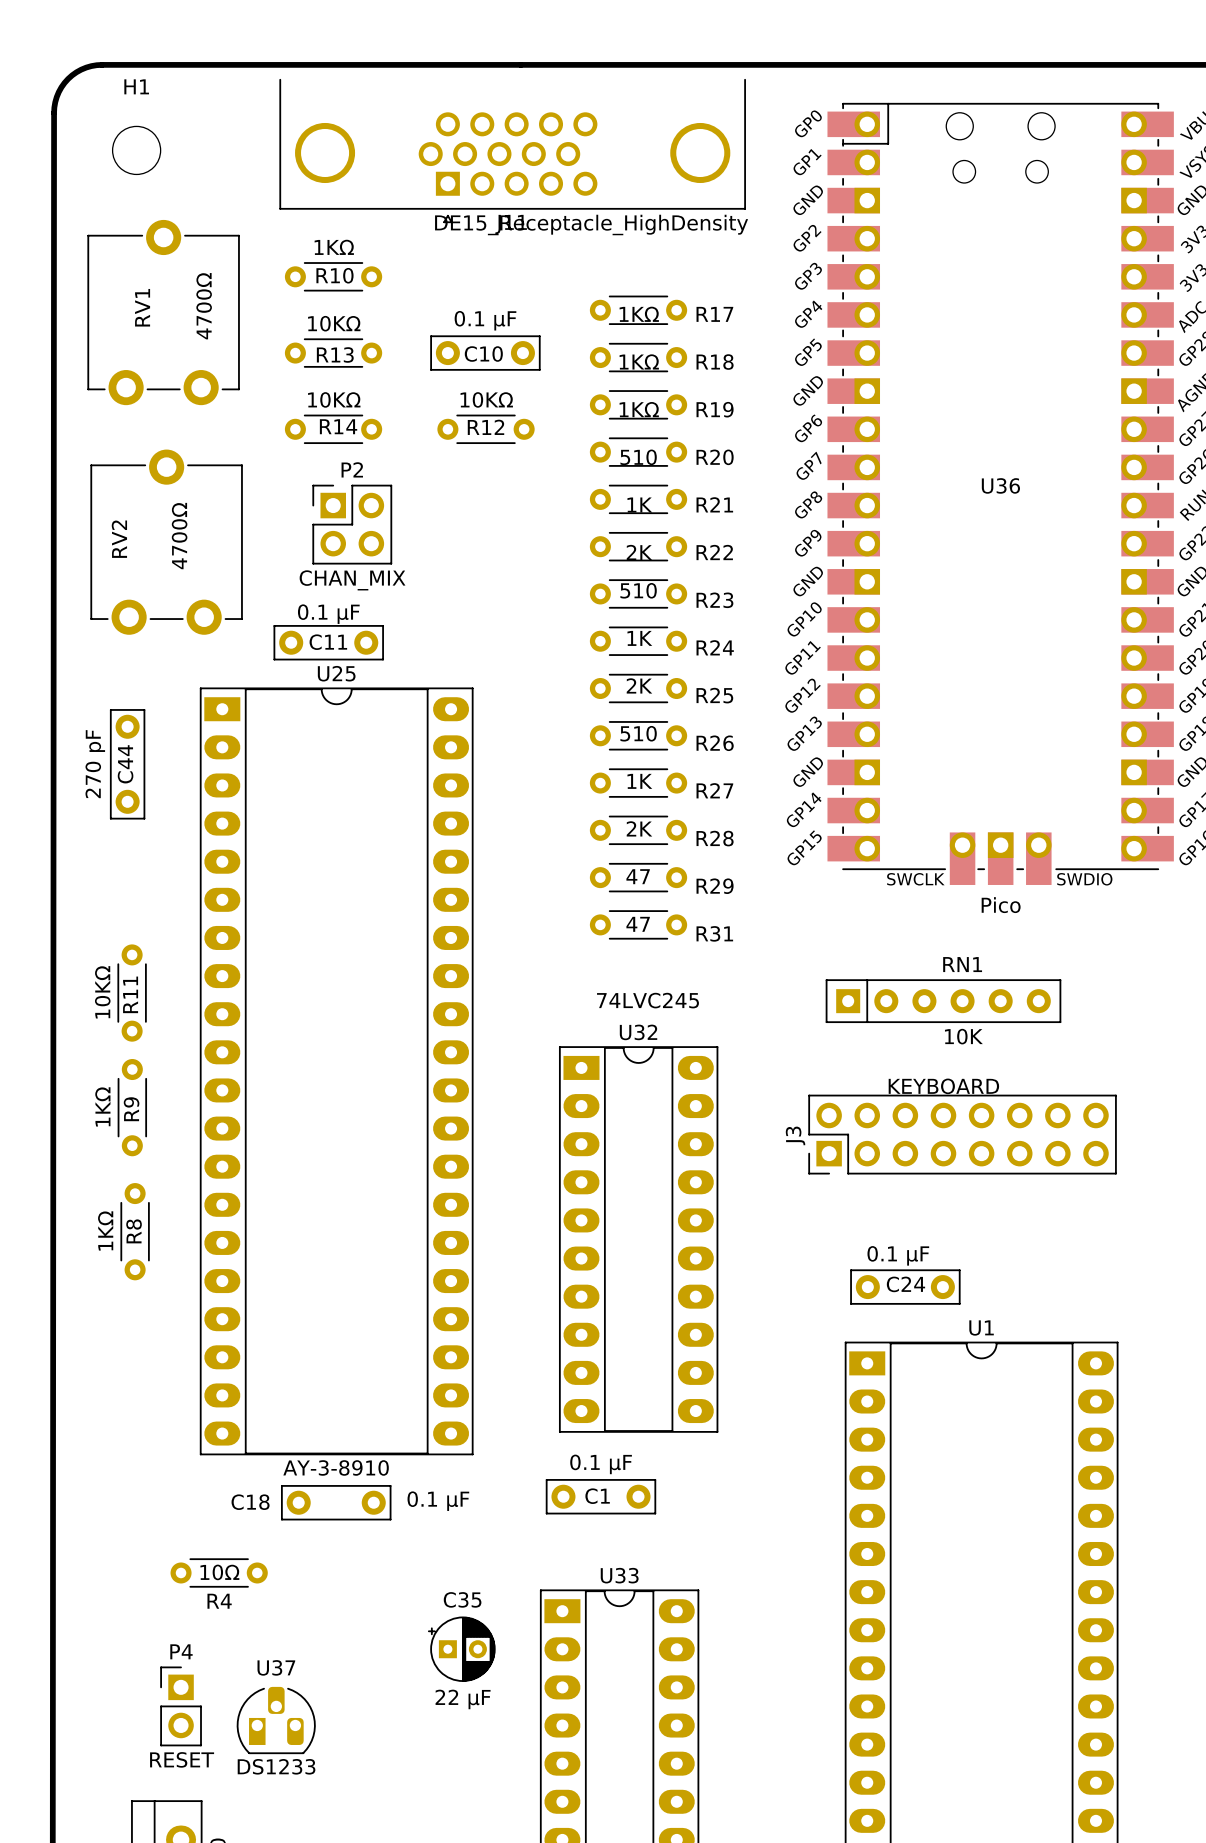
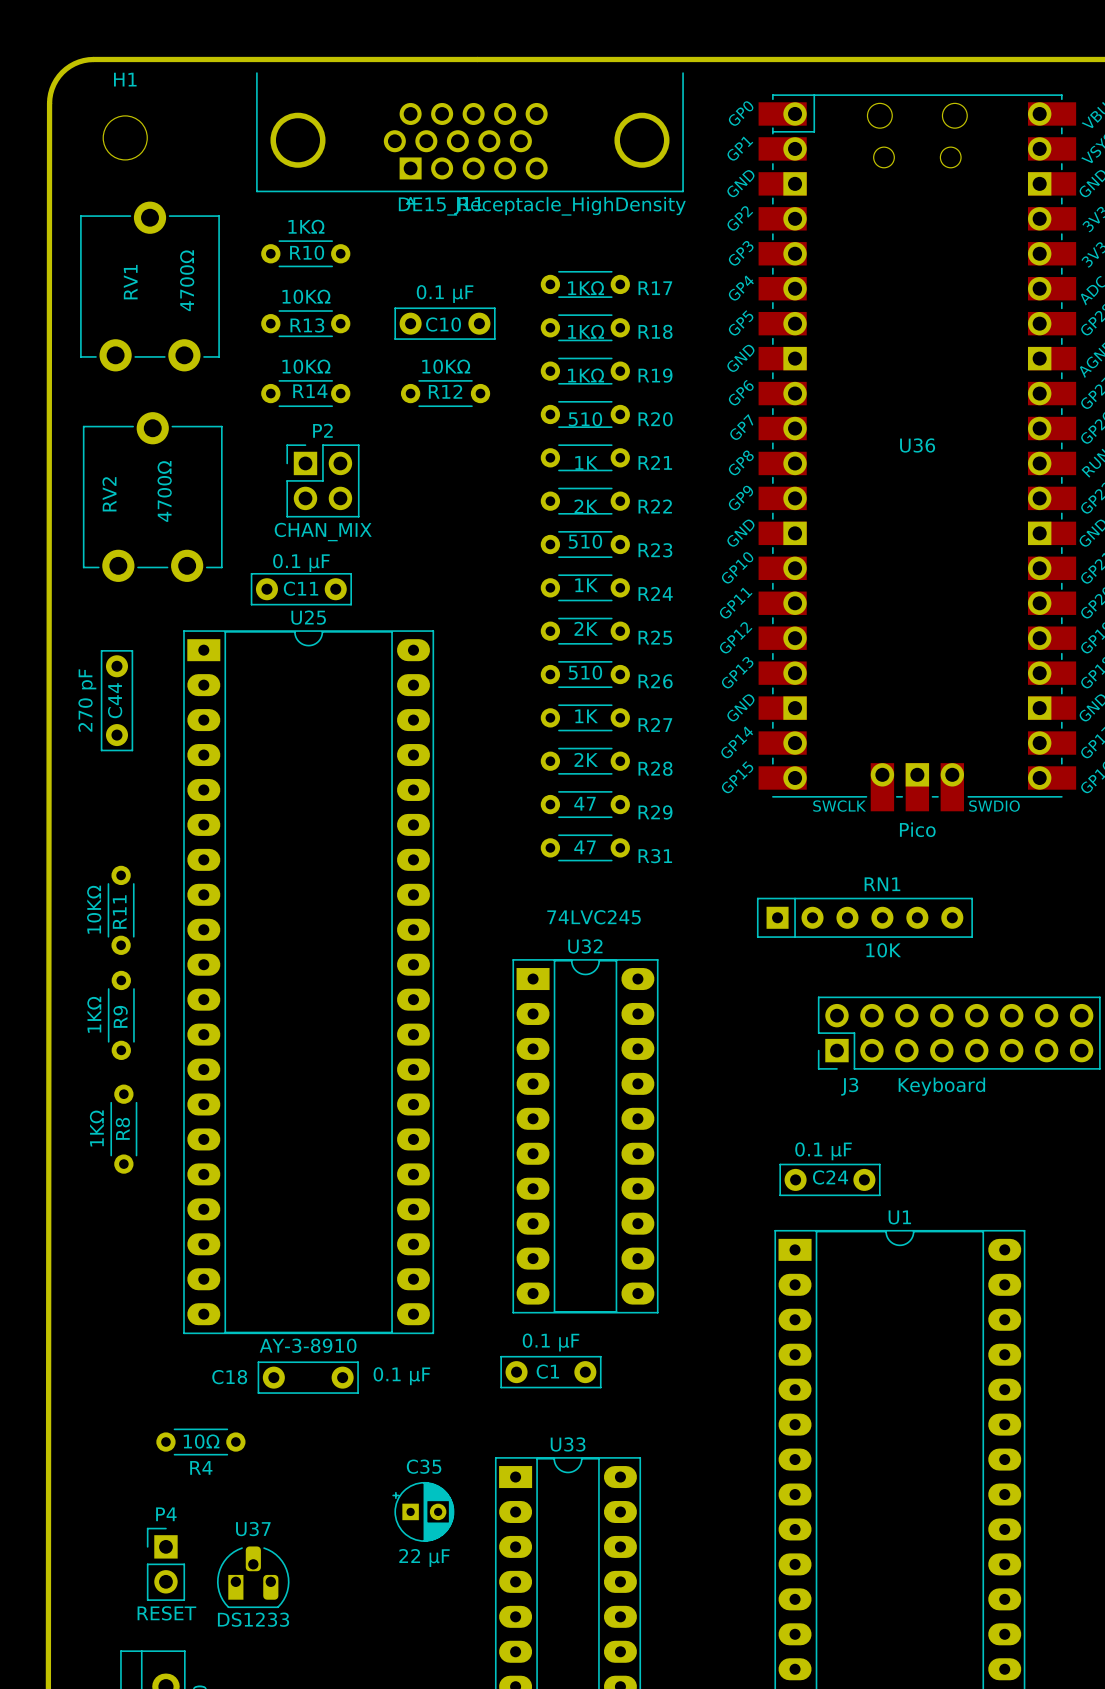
J3 value: KEYBOARD (943, 1086) -> Keyboard (941, 1086)
J3 position: (962, 1134) -> (959, 1033)
J3 name rotation: 0° (795, 1135) -> 90° clockwise (849, 1086)
J3 name position: J3 (795, 1135) -> J3 (849, 1086)

